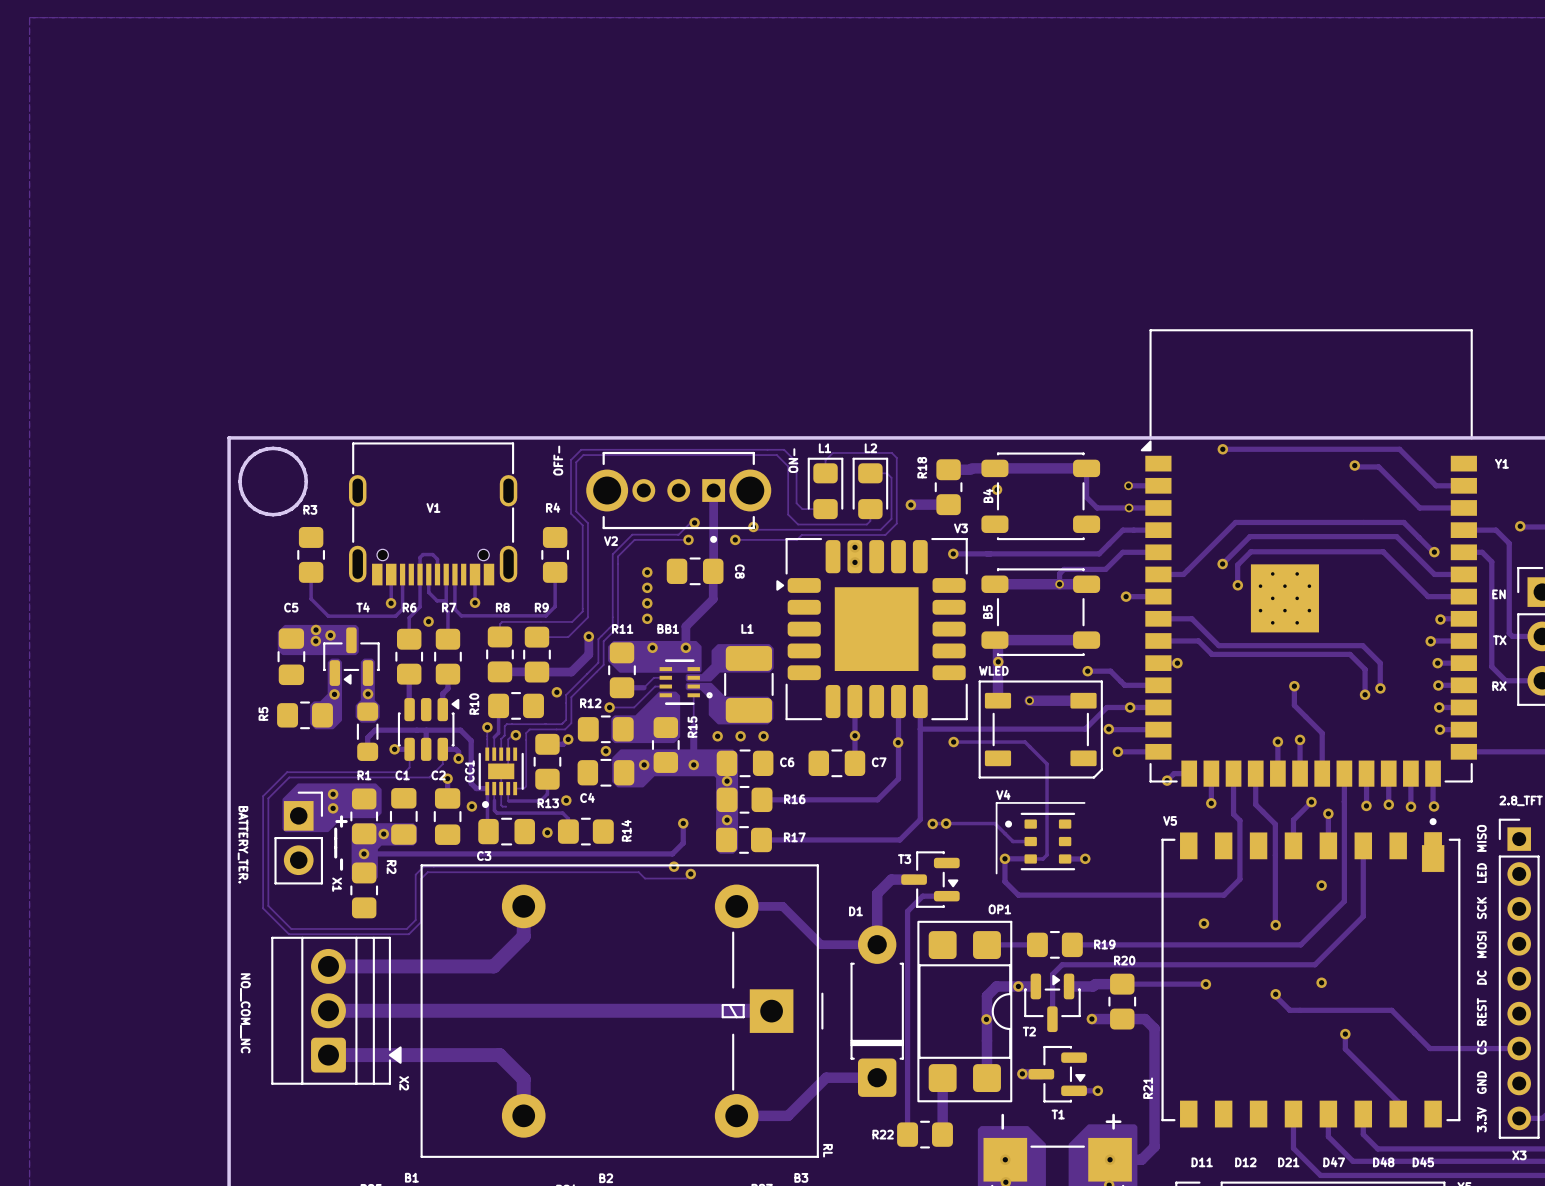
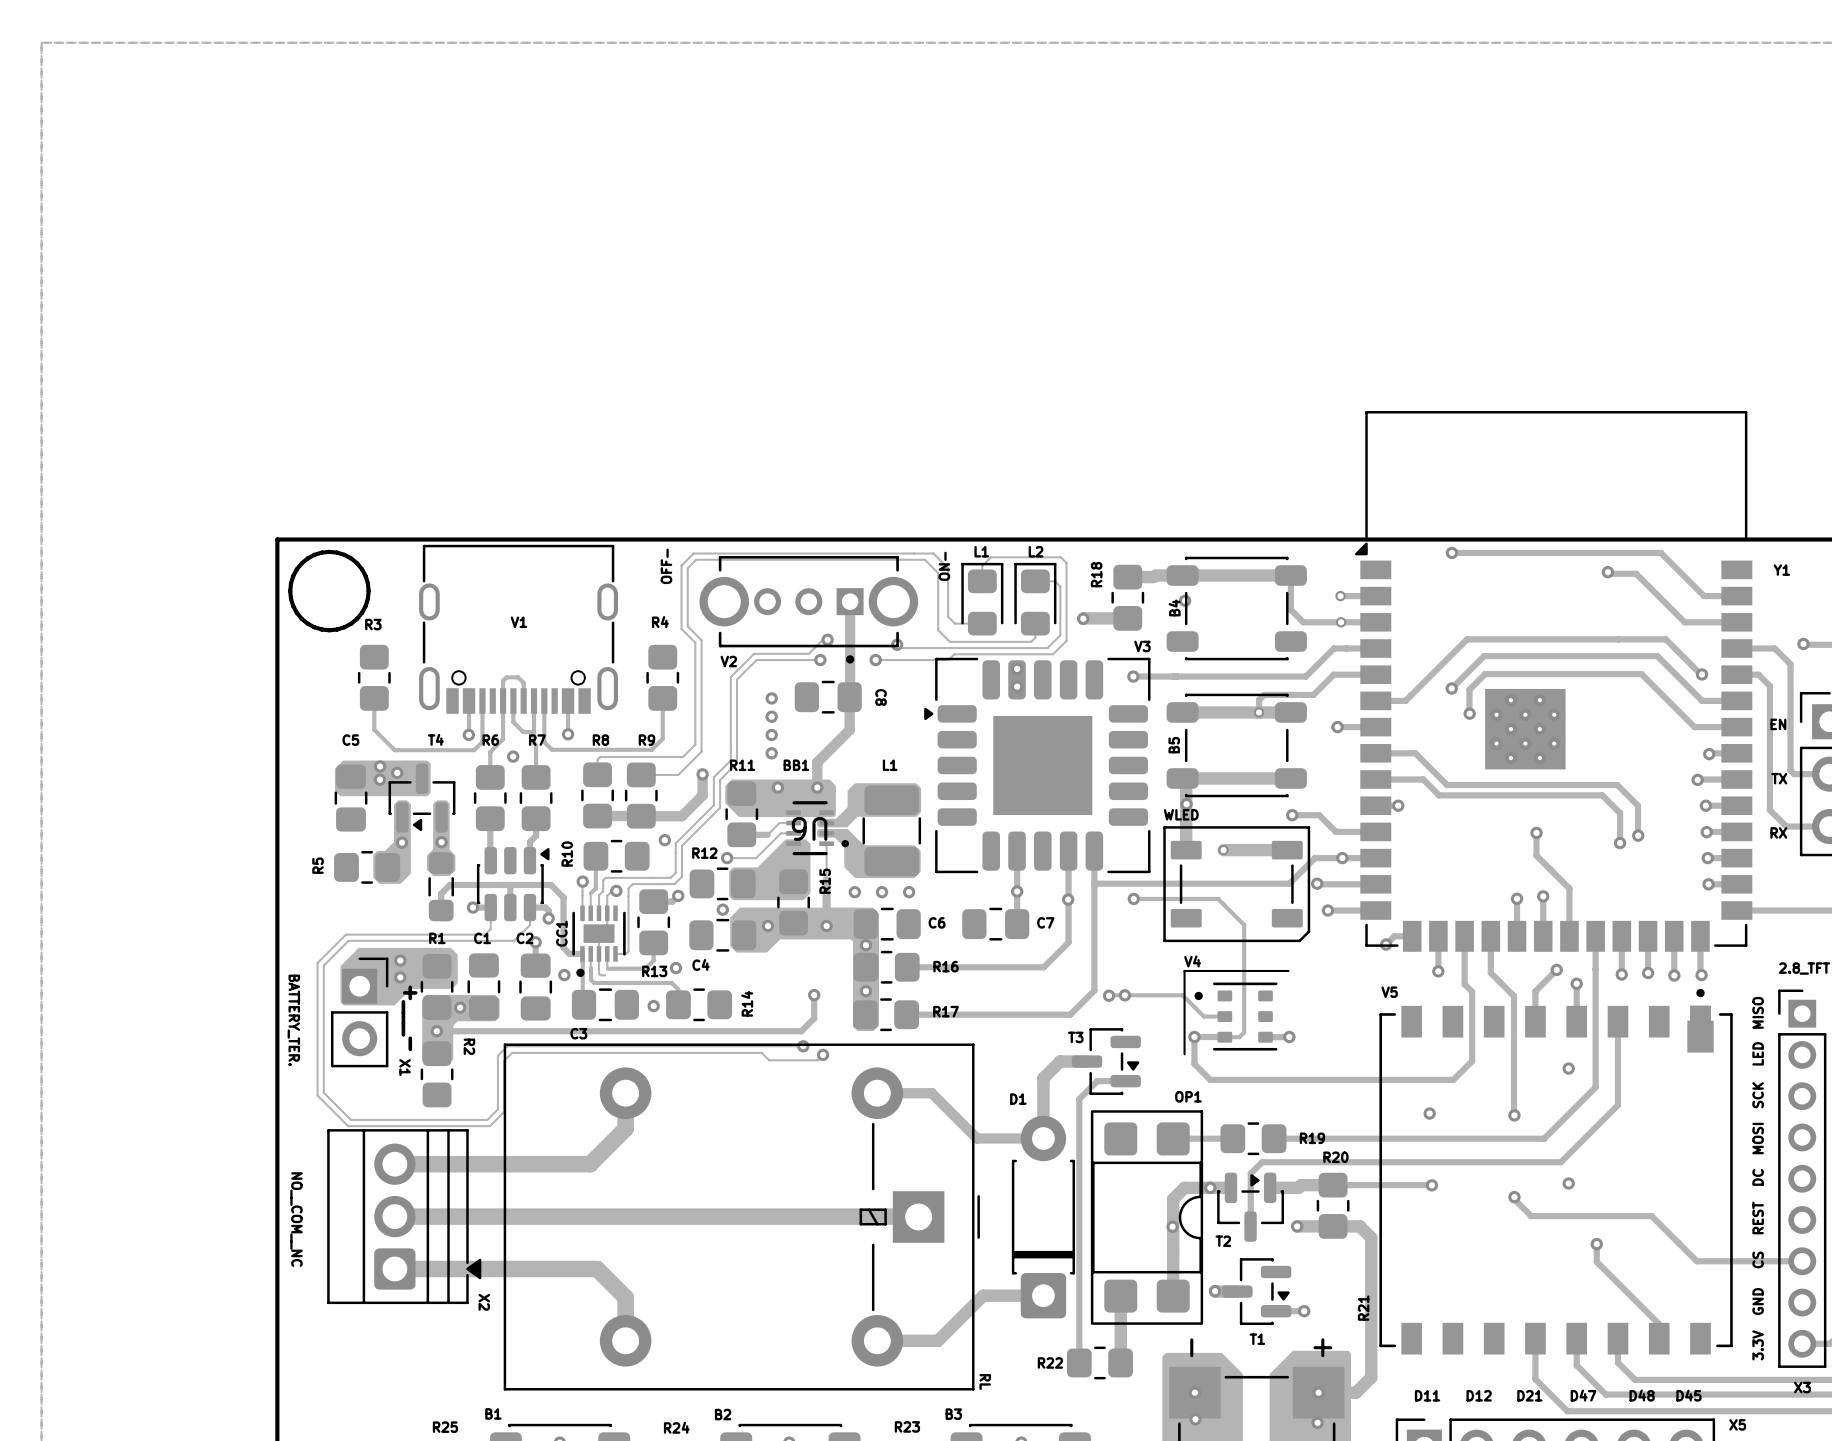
U6 name: none -> U6 (809, 828)

